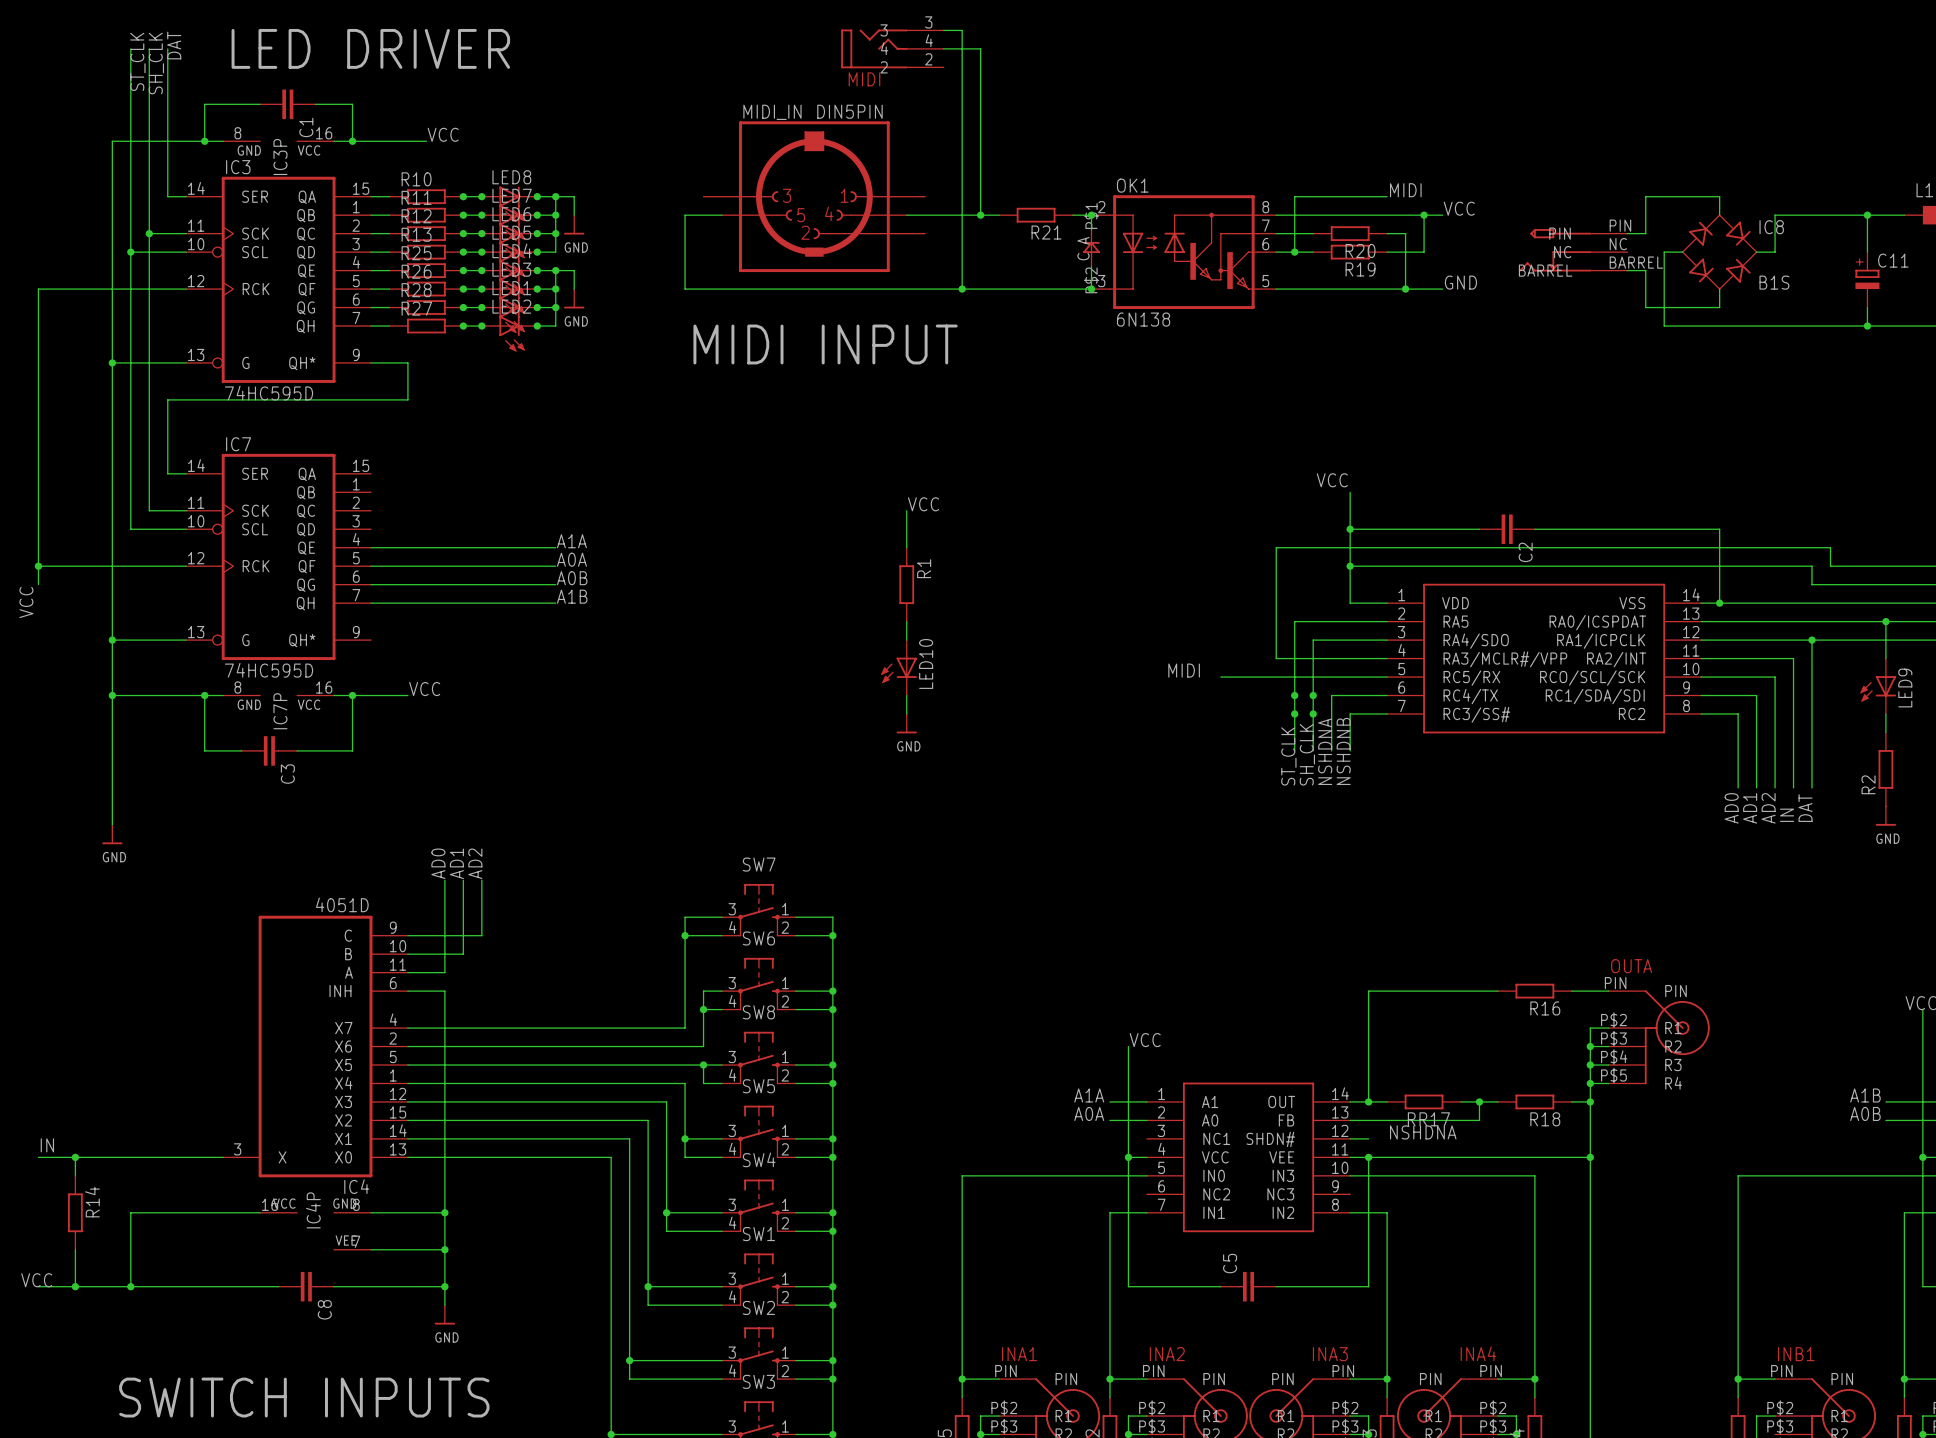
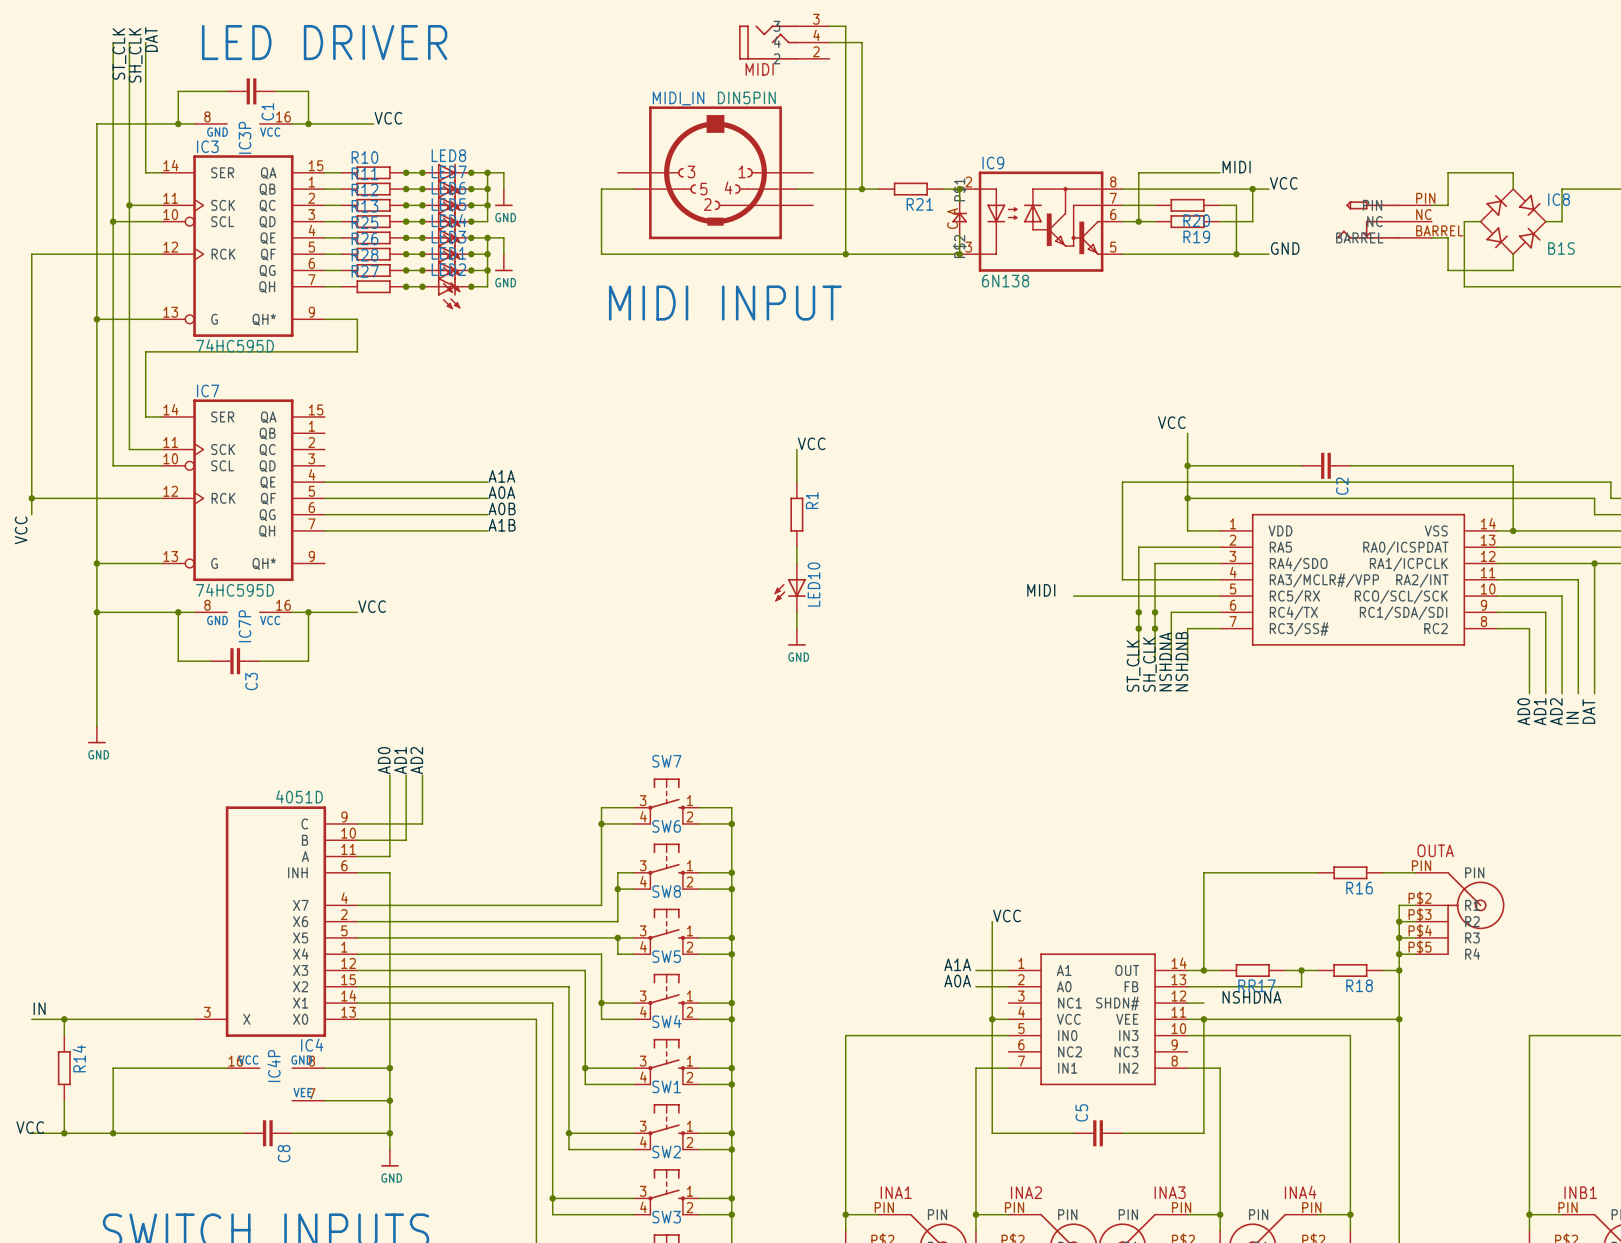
OK1 name: OK1 (1132, 185) -> IC9 (993, 163)

